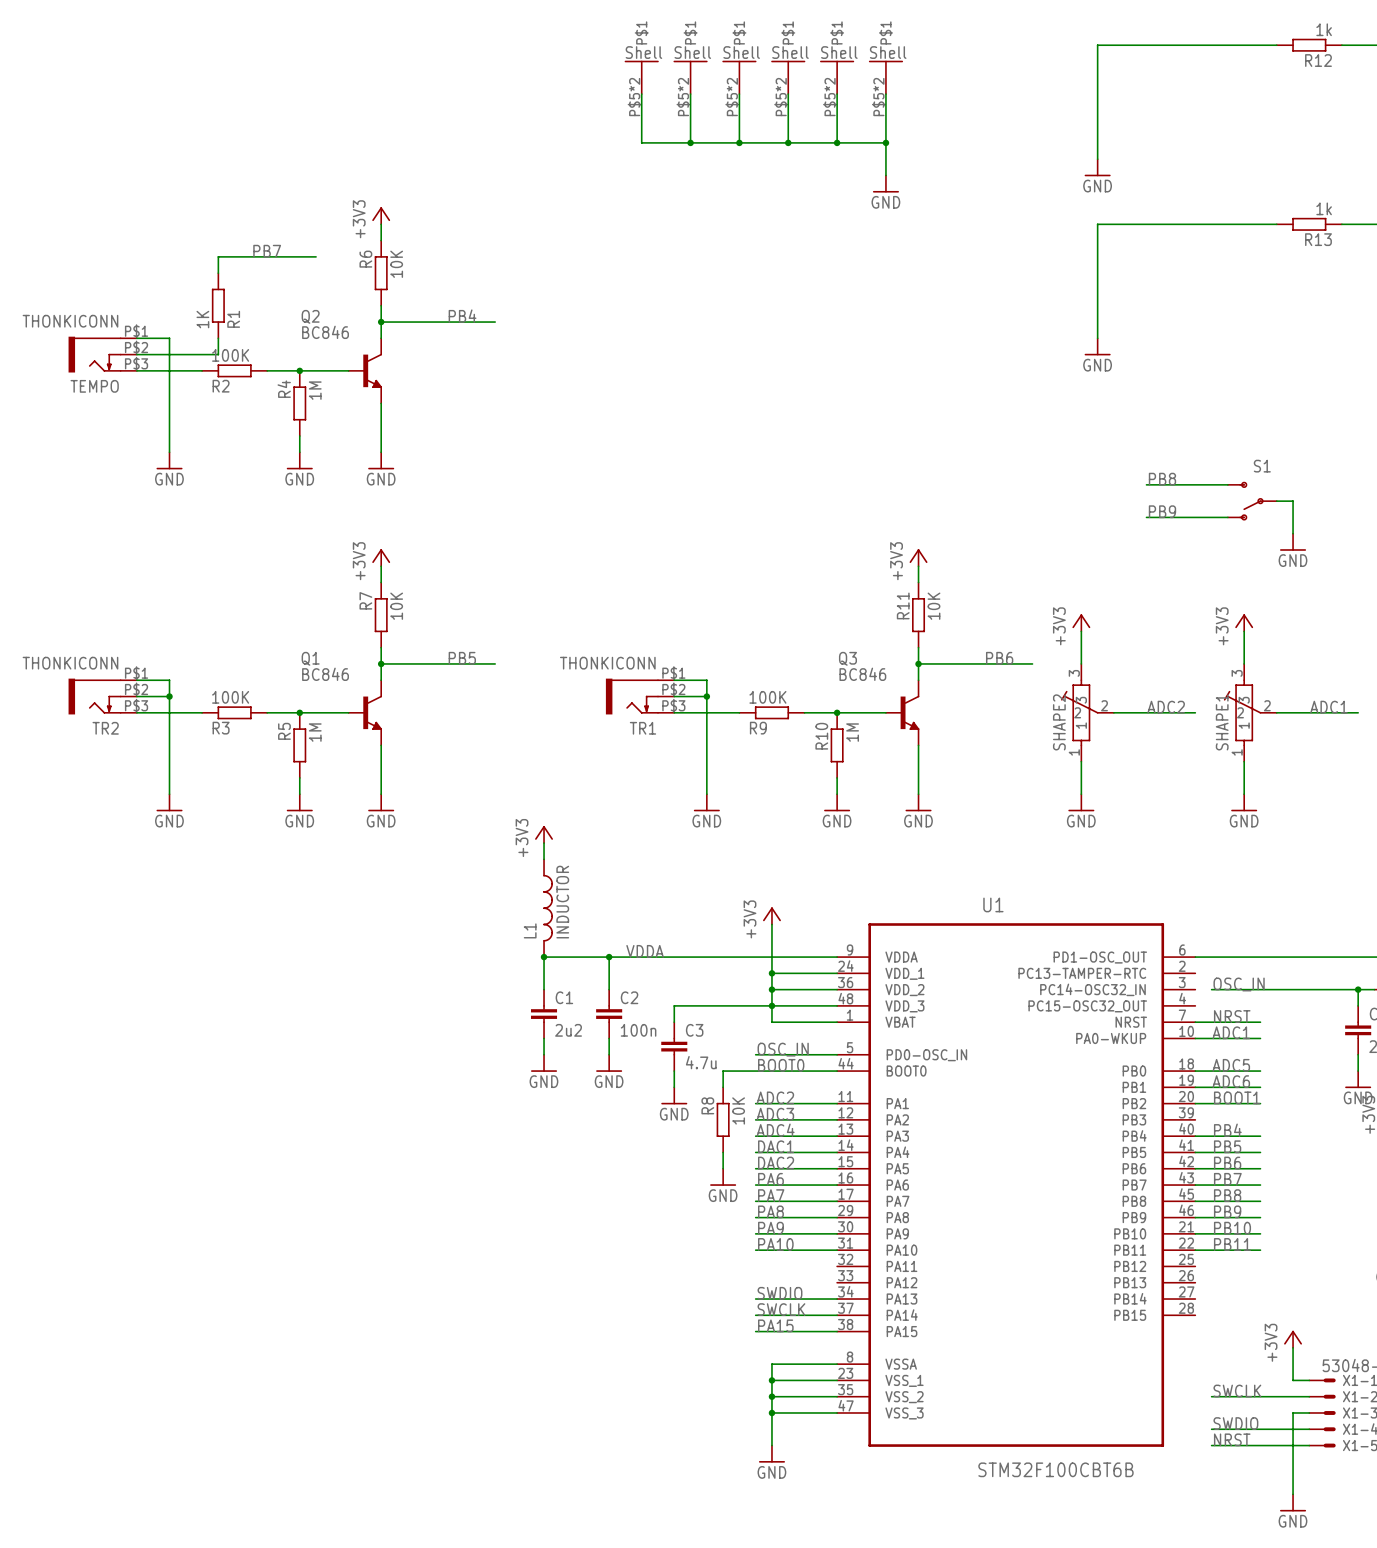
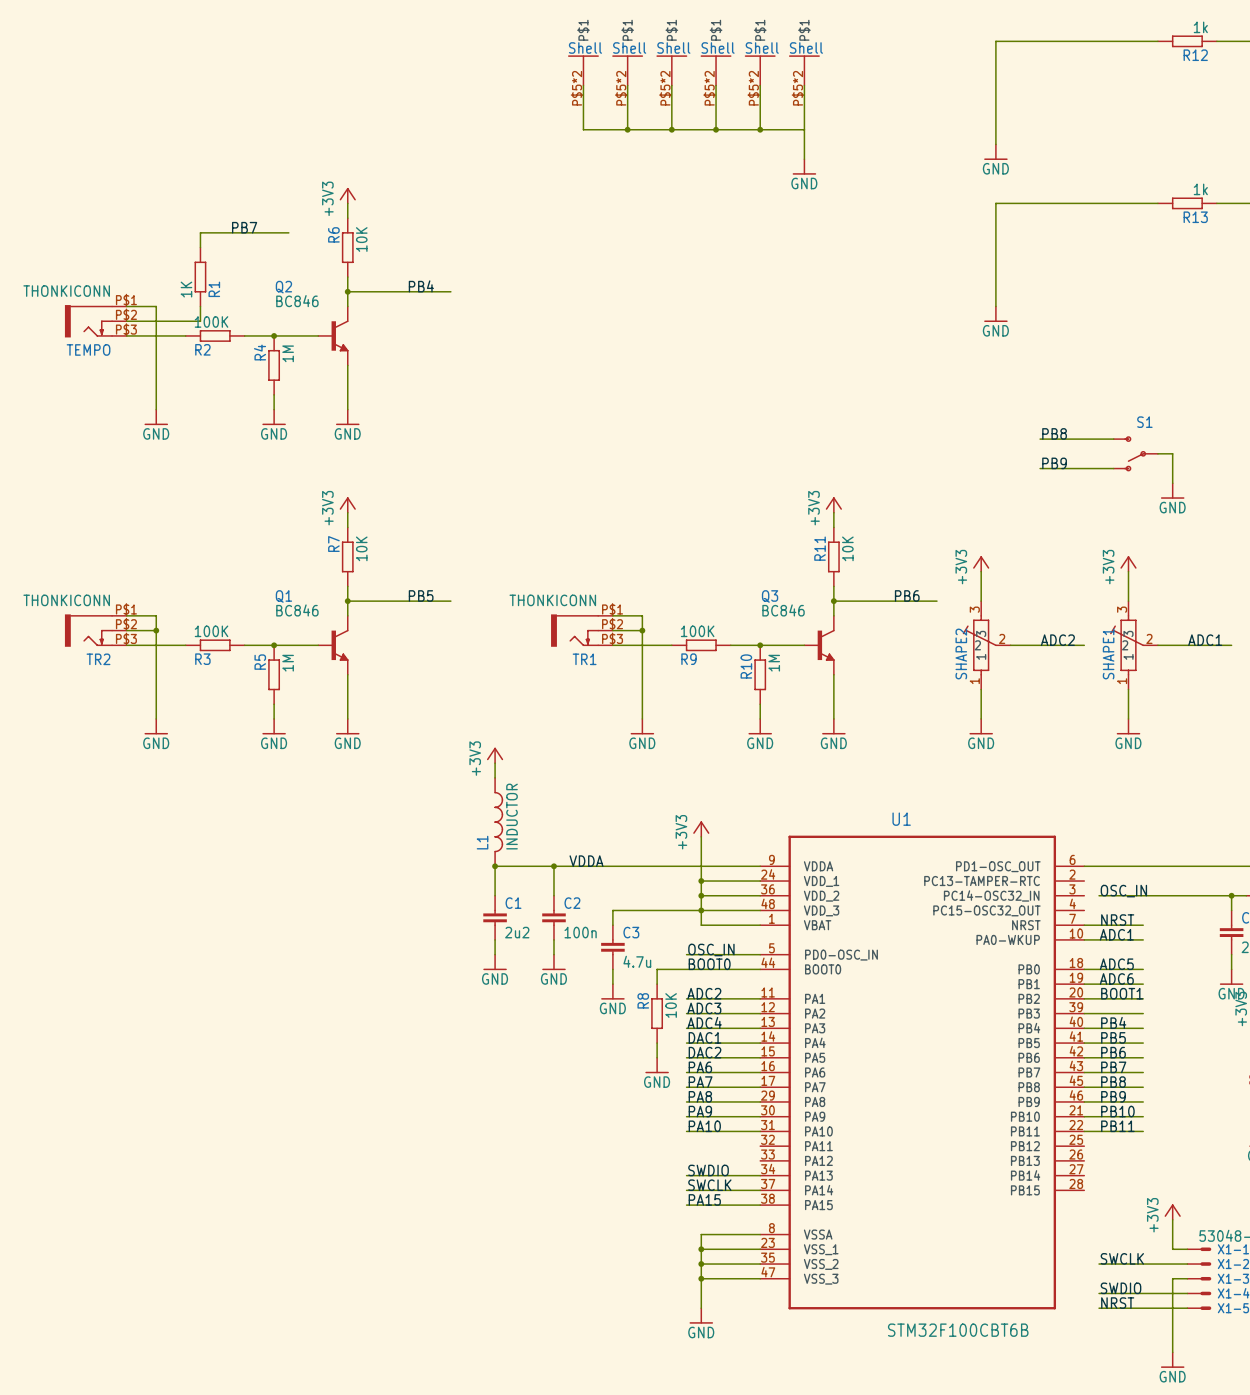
junction: (885, 142) -> none
wire: none -> (1084, 1013) (1143, 1013)

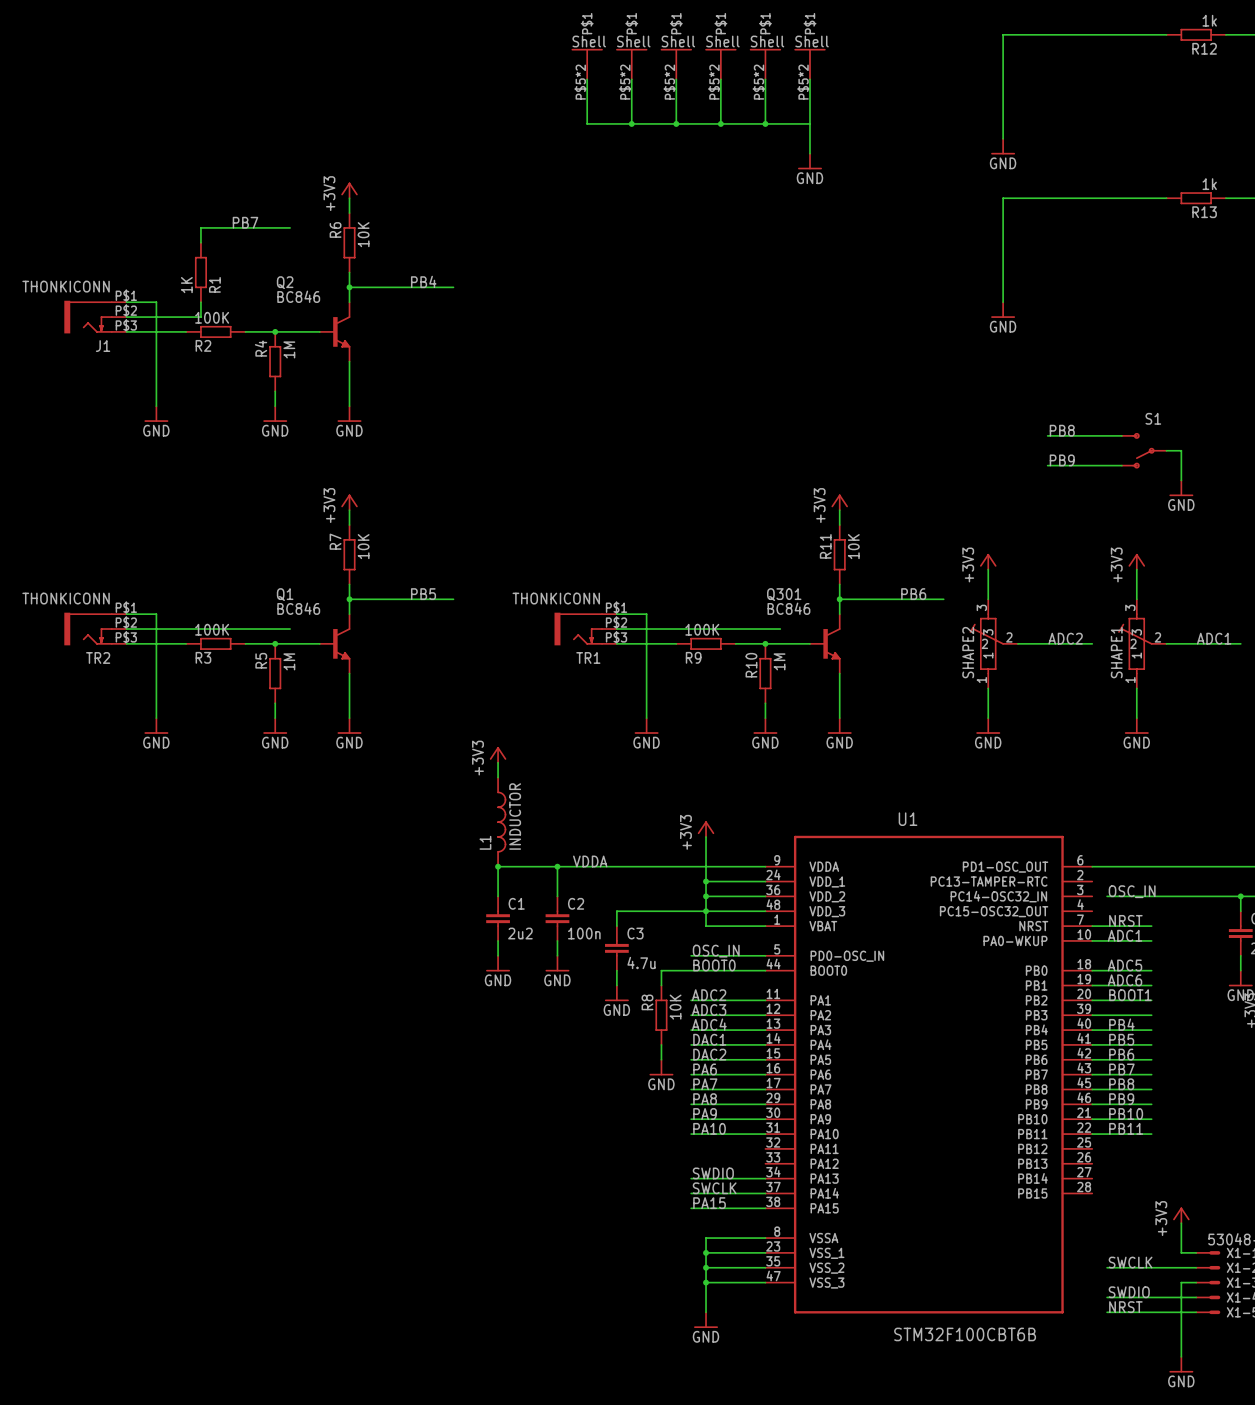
TEMPO name: TEMPO (88, 349) -> J1 (103, 346)
Q3 name: Q3 (770, 596) -> Q301 (784, 594)
wire: none -> (156, 629) (290, 629)
junction: (156, 630) -> none
wire: none -> (646, 629) (780, 629)
junction: (642, 630) -> none

